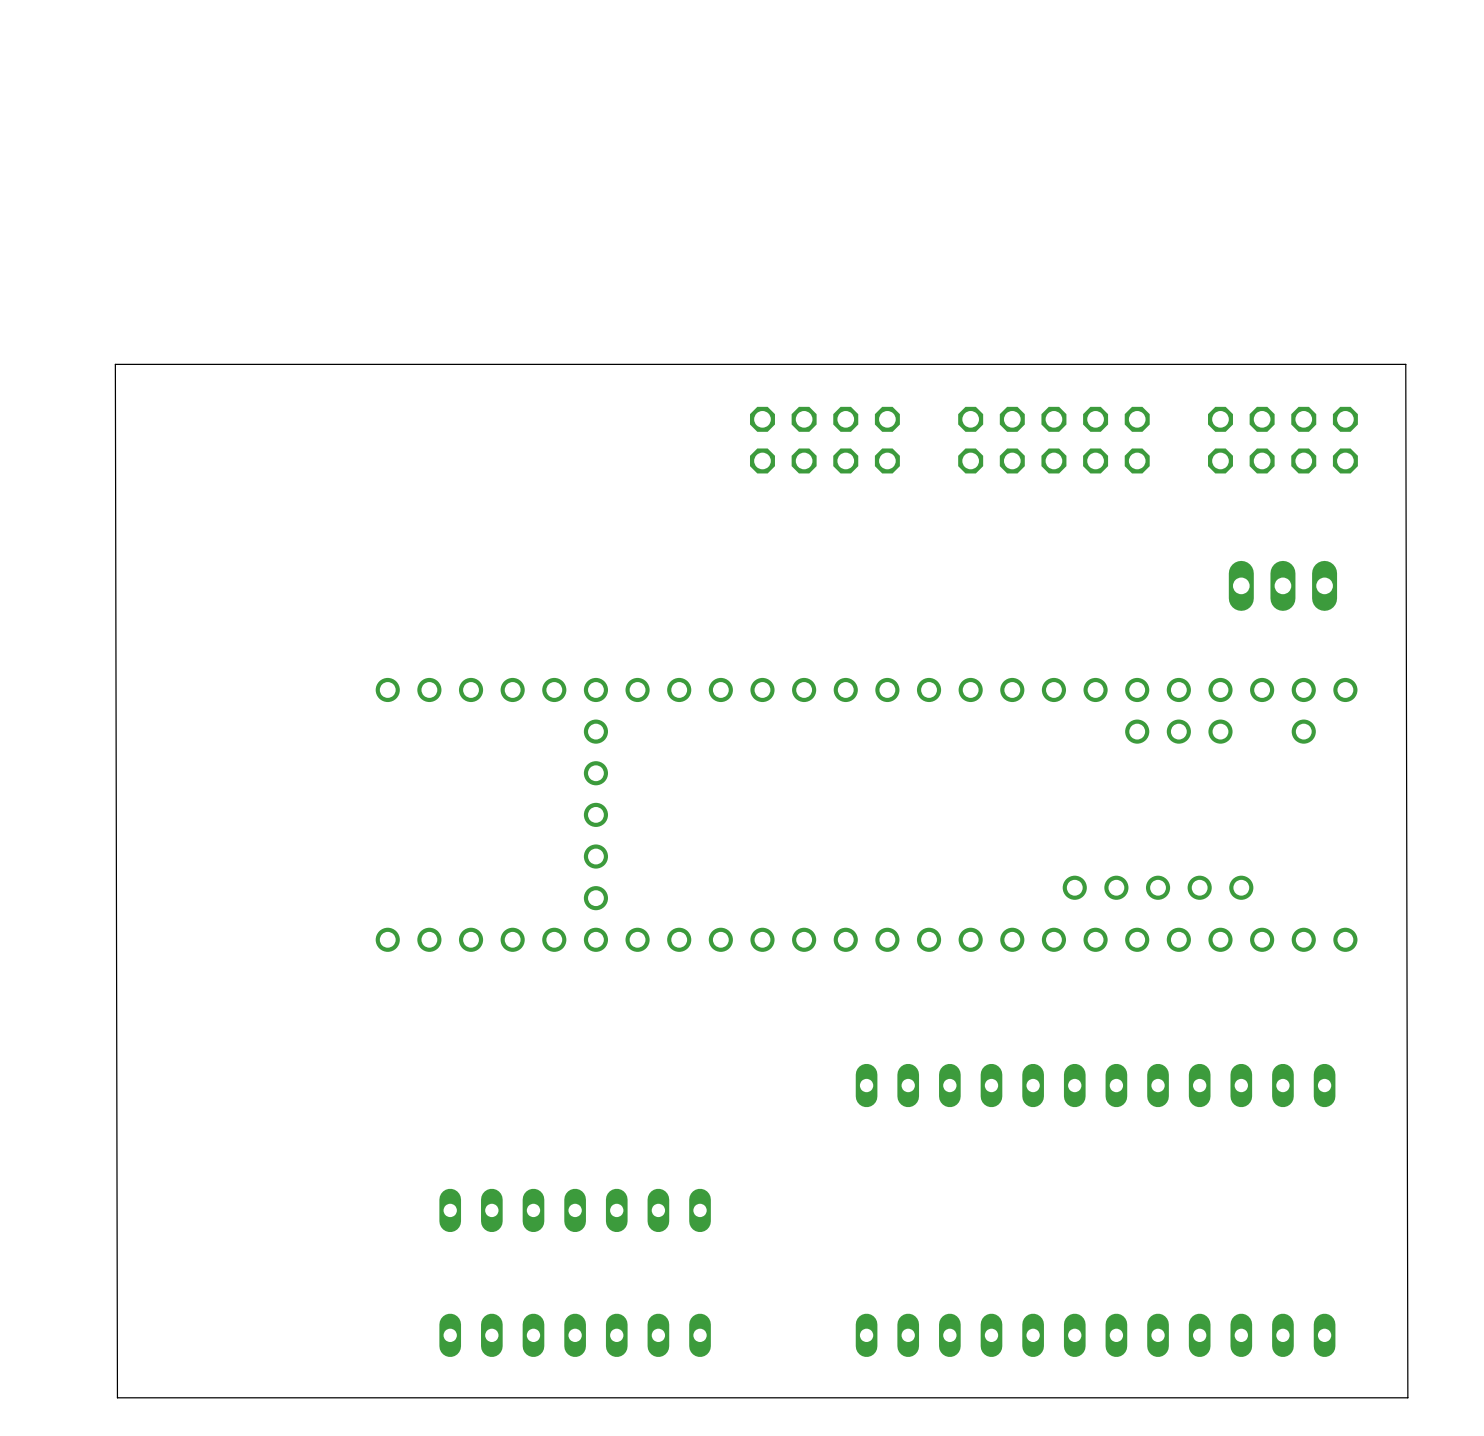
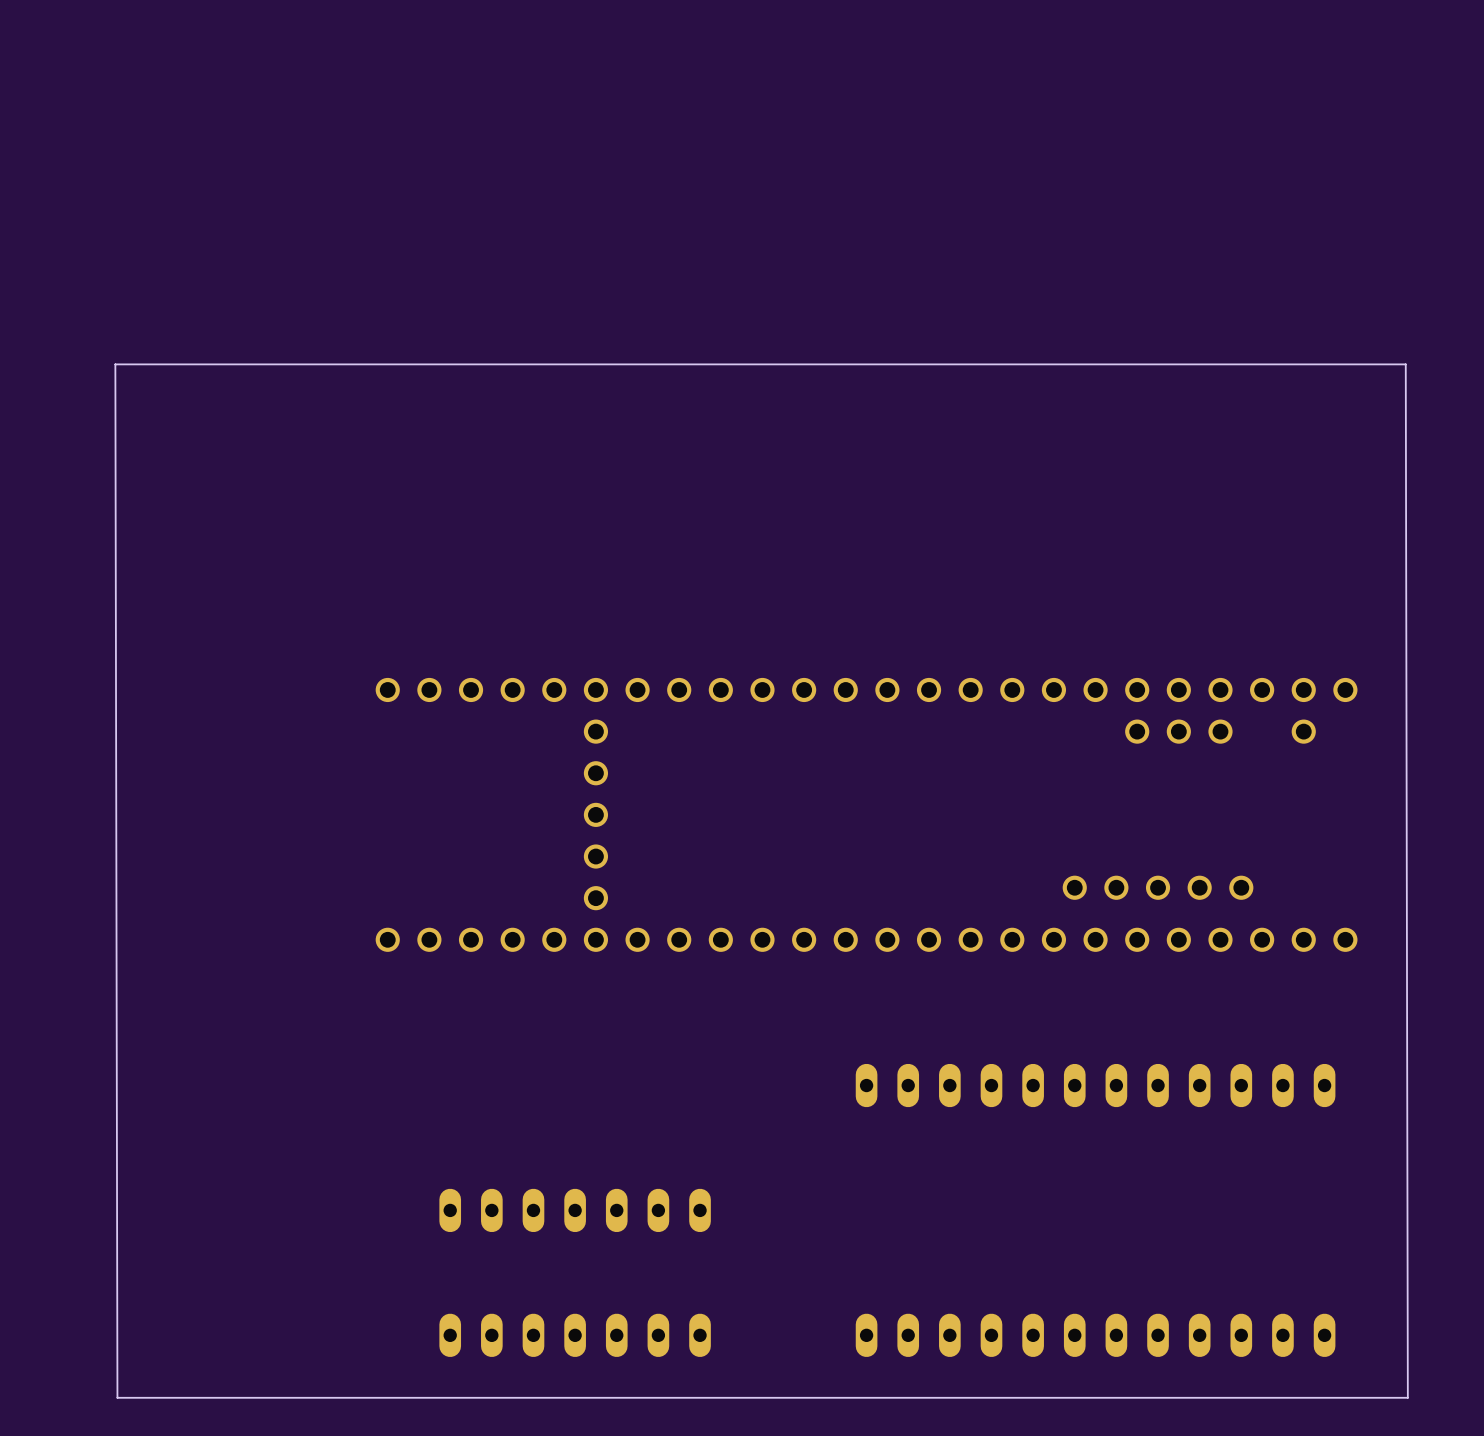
part: (824, 440) -> none
part: (1053, 440) -> none
part: (1282, 440) -> none
part: (1282, 585) -> none

